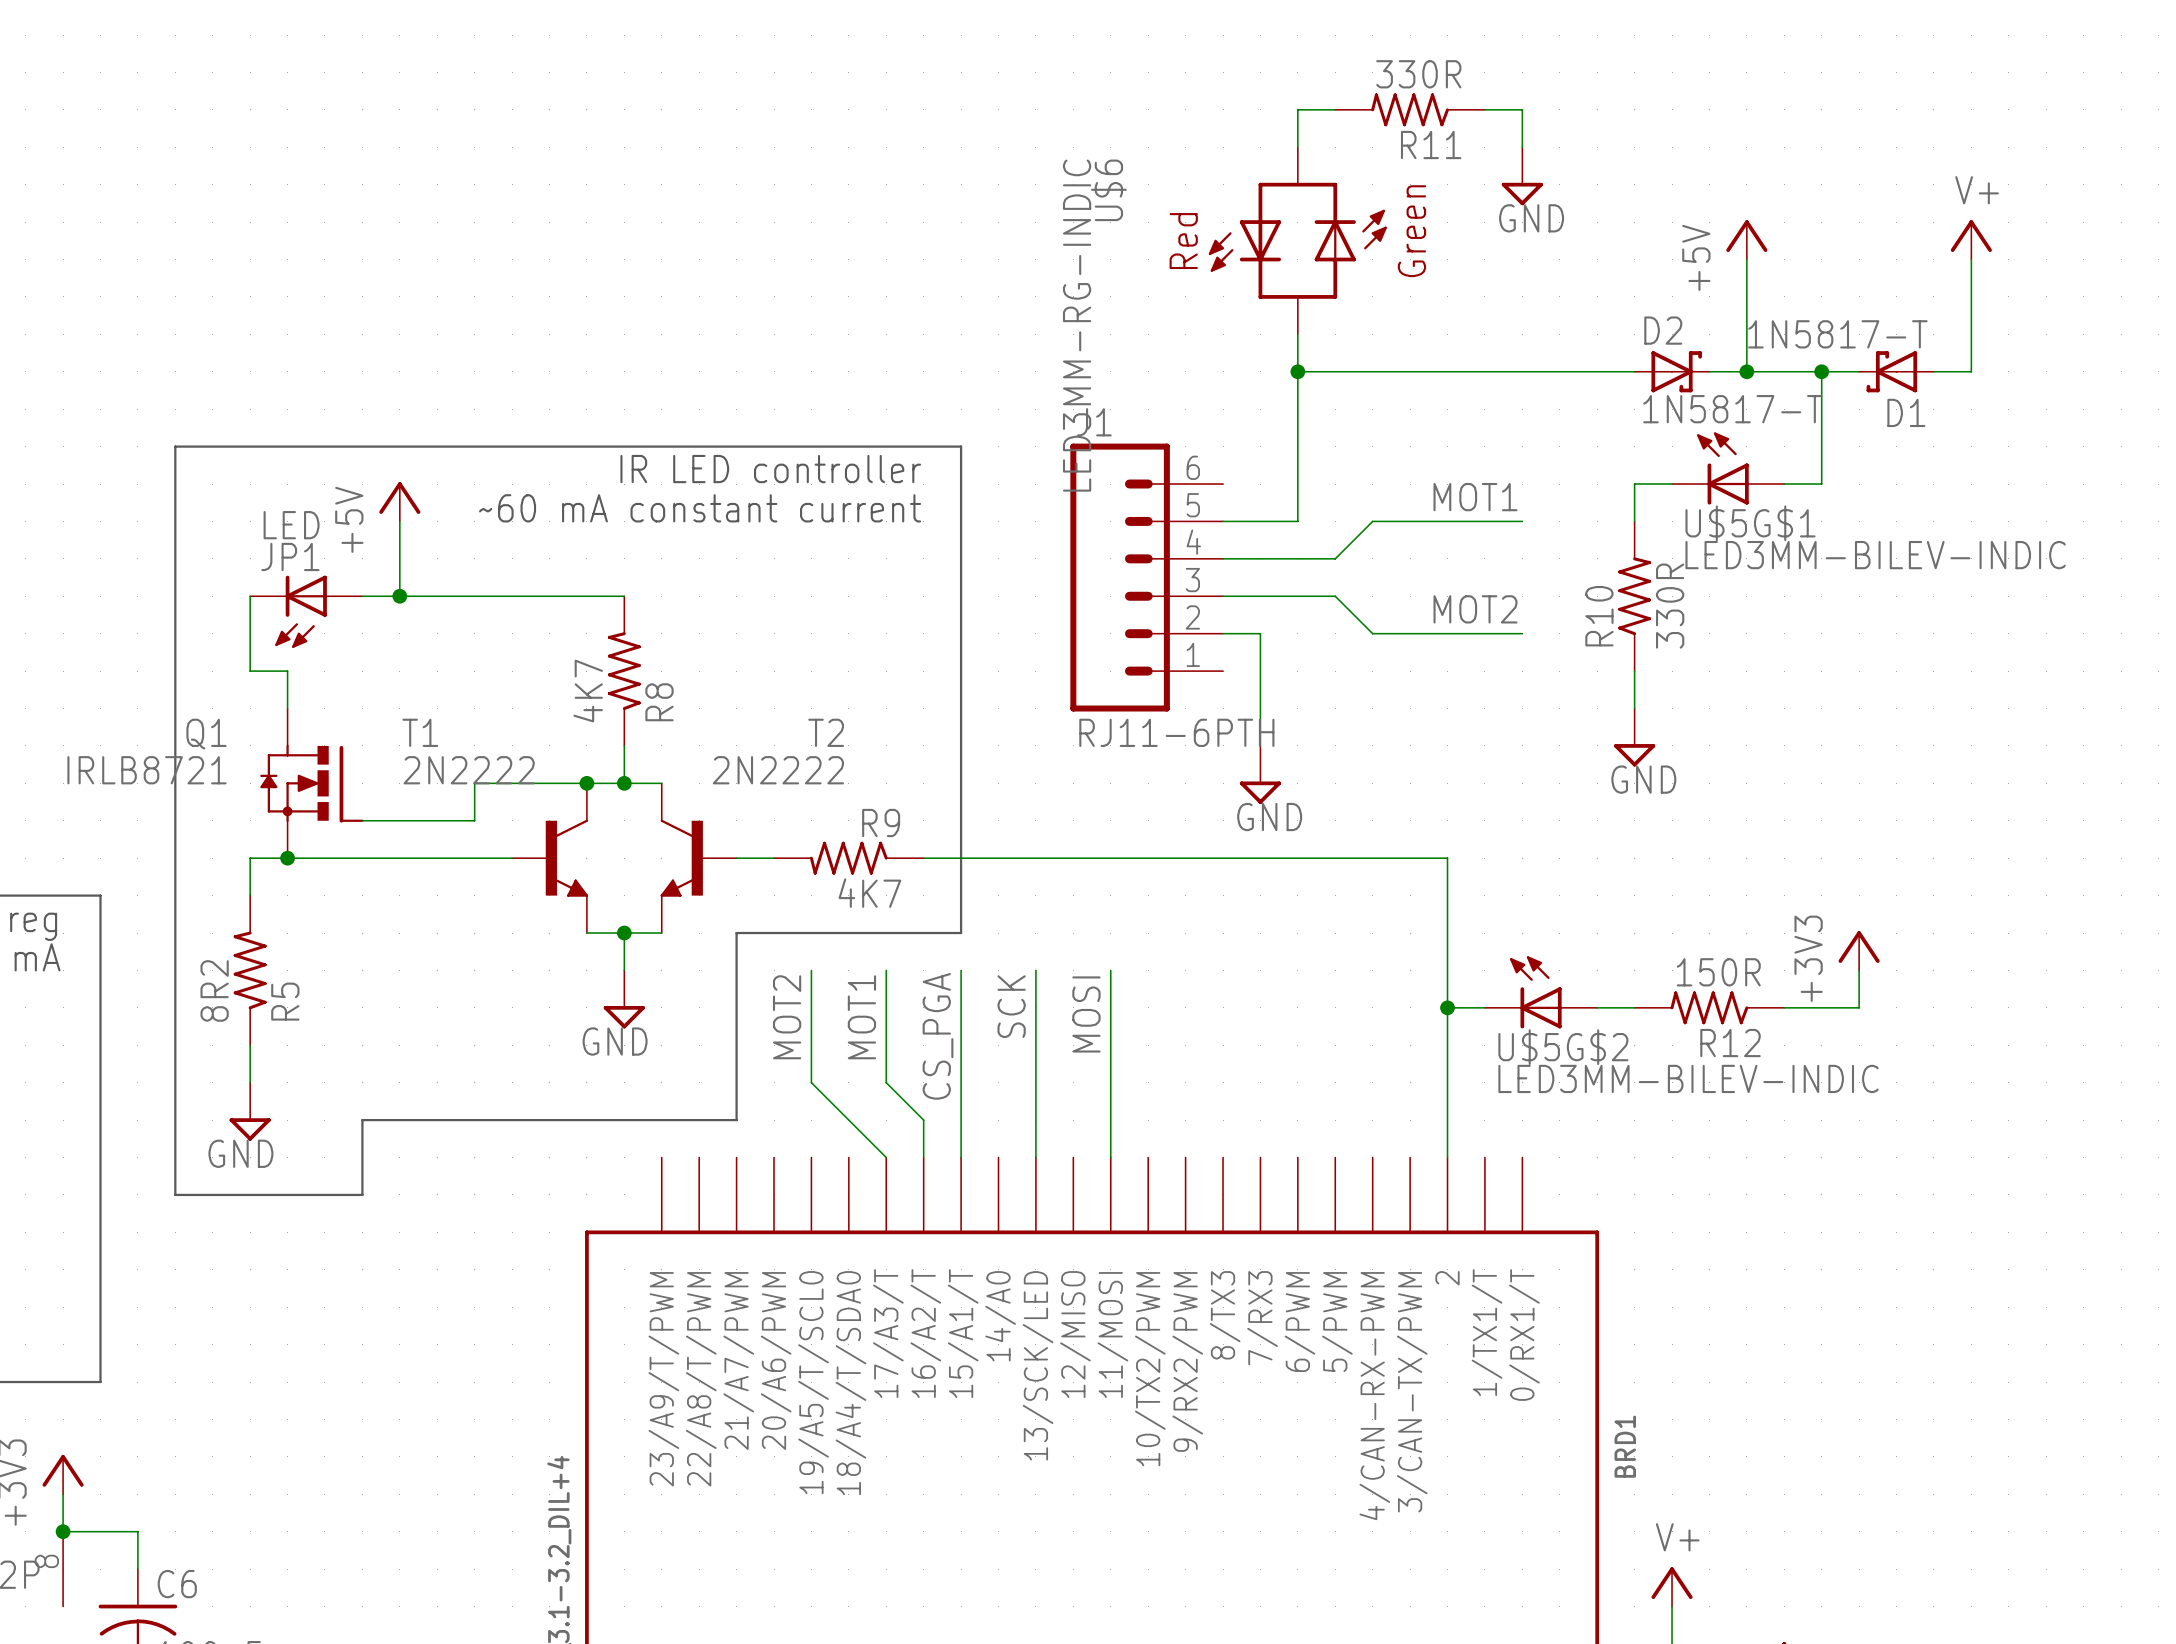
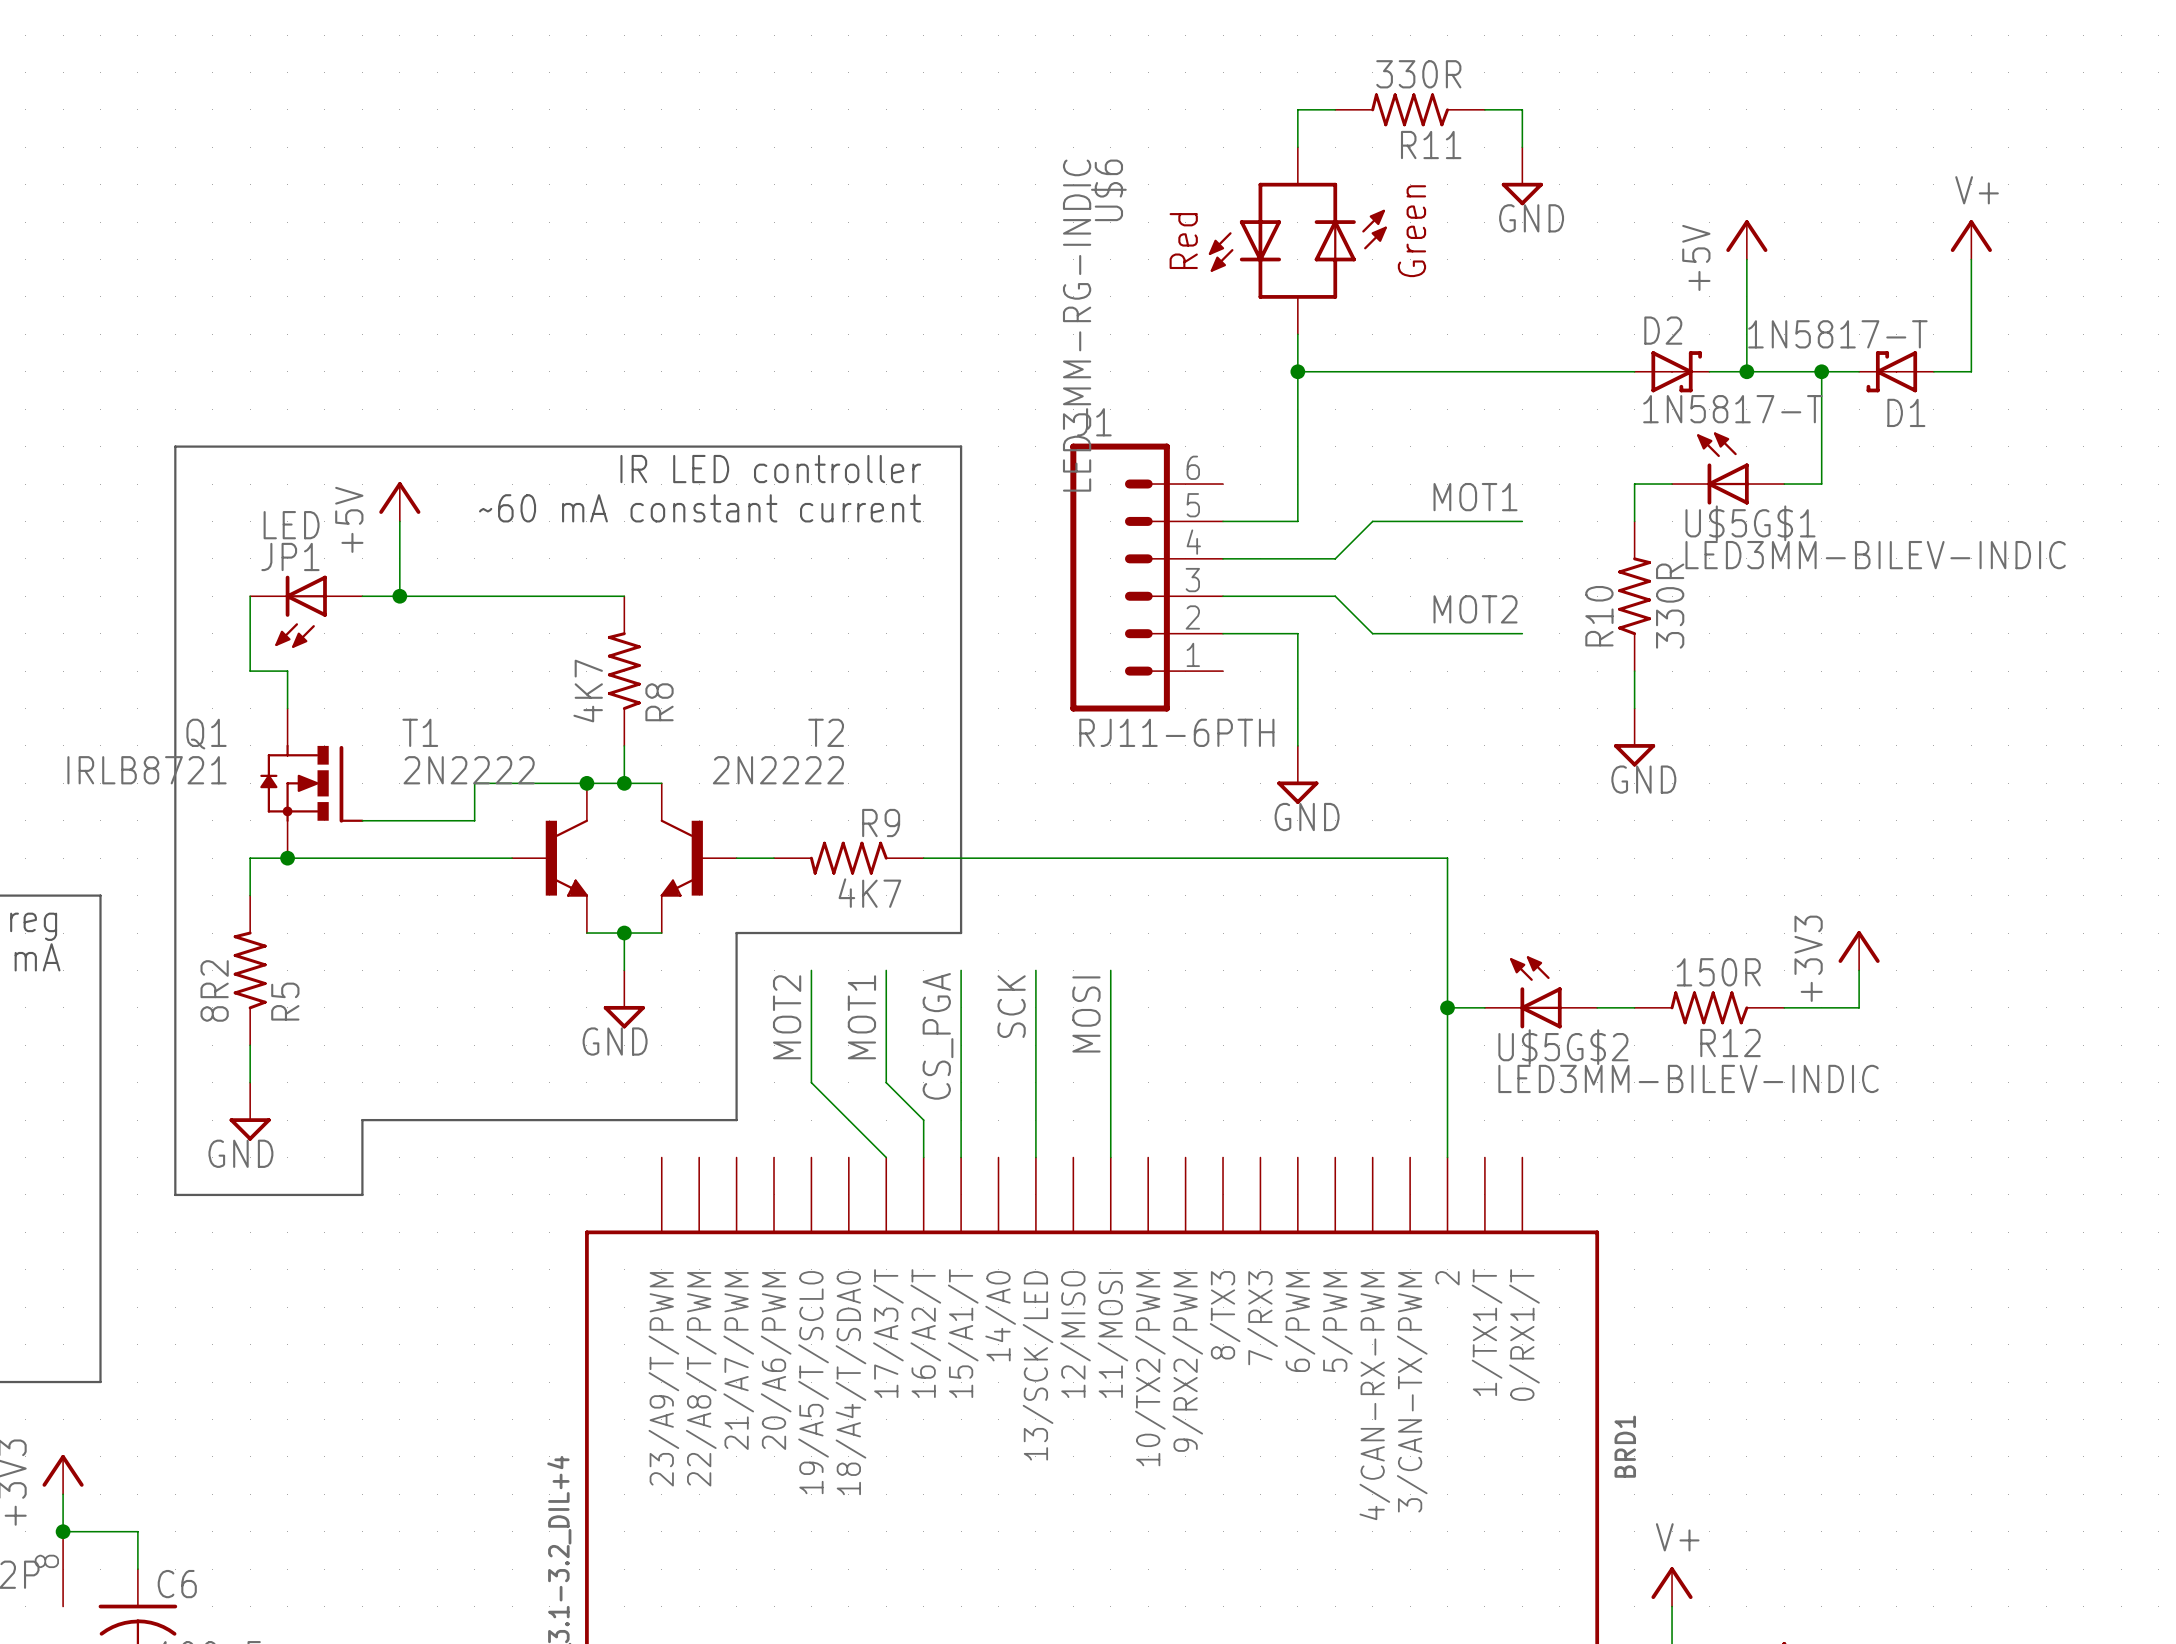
wire: (1260, 633) (1260, 745) -> (1260, 633) (1297, 633) (1297, 745)
power symbol position: GND (1260, 774) -> GND (1297, 774)

